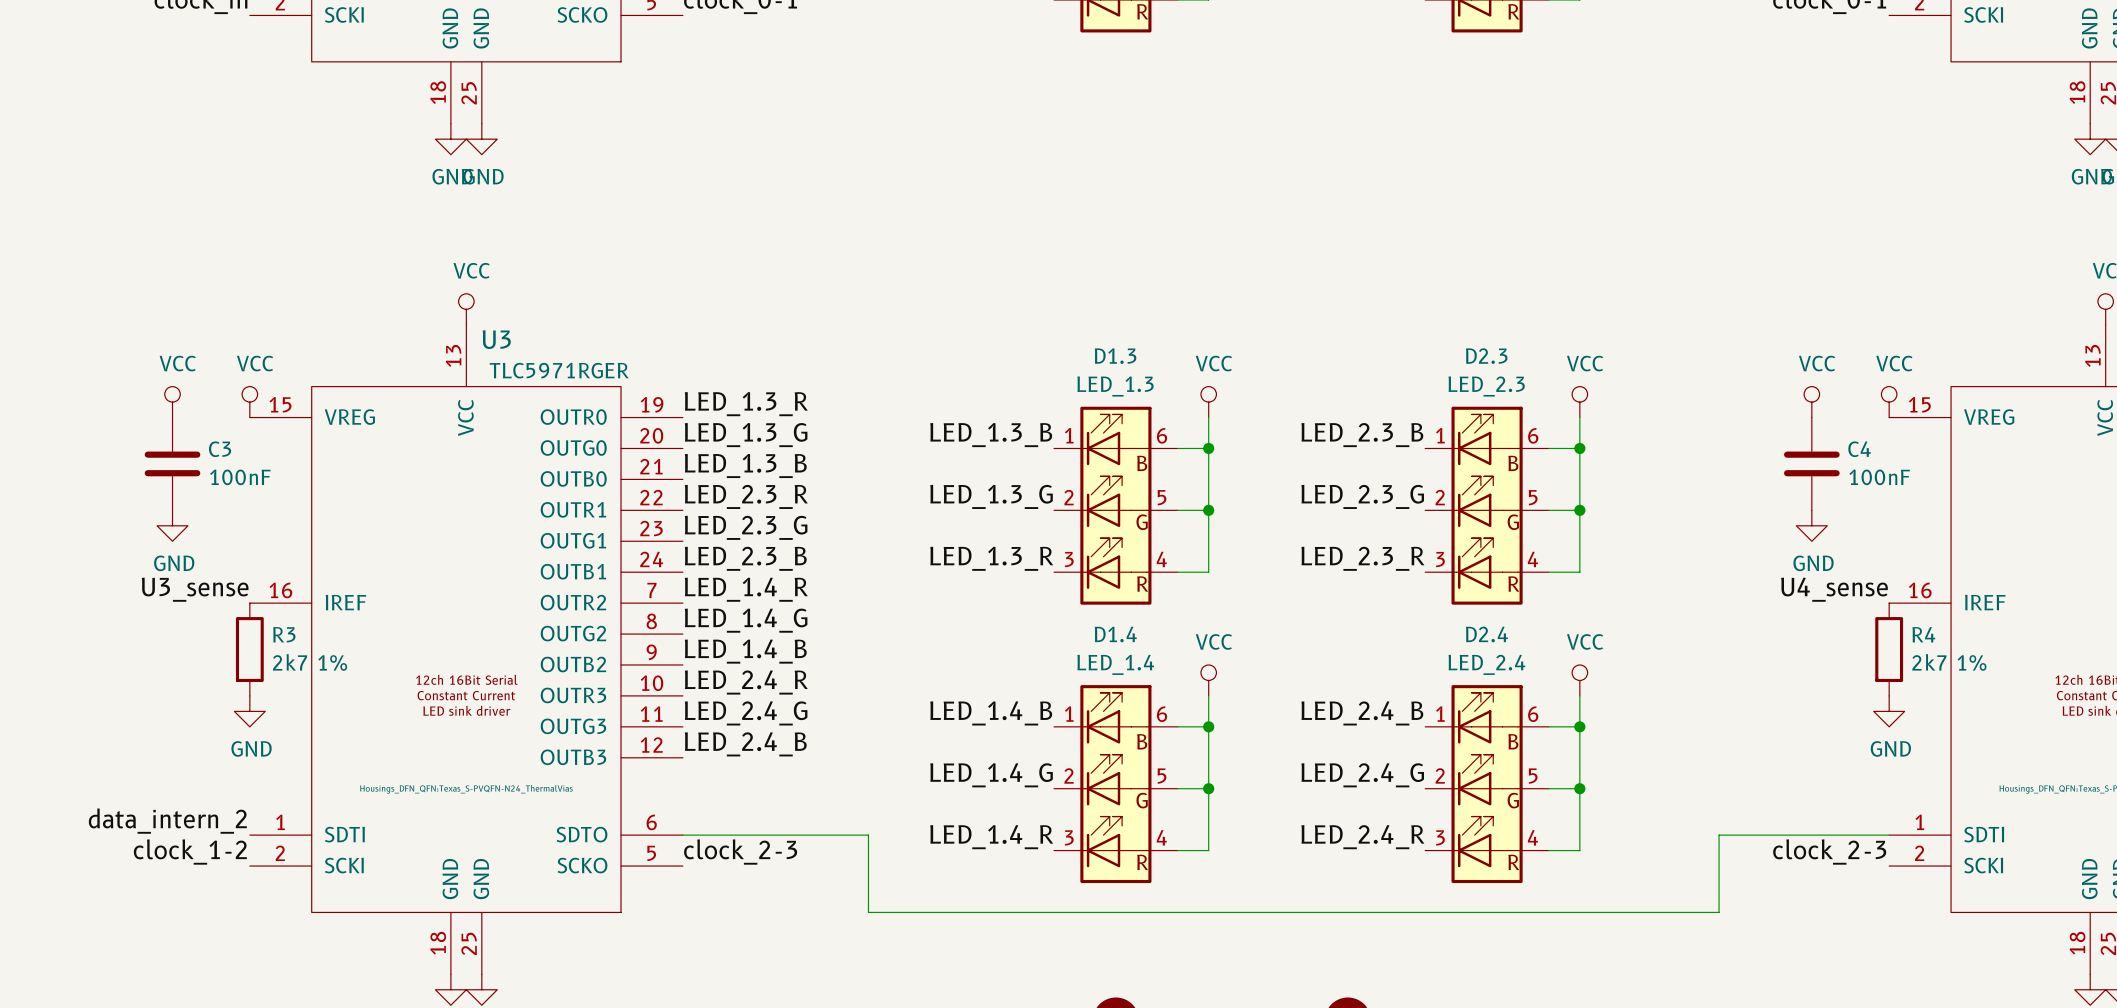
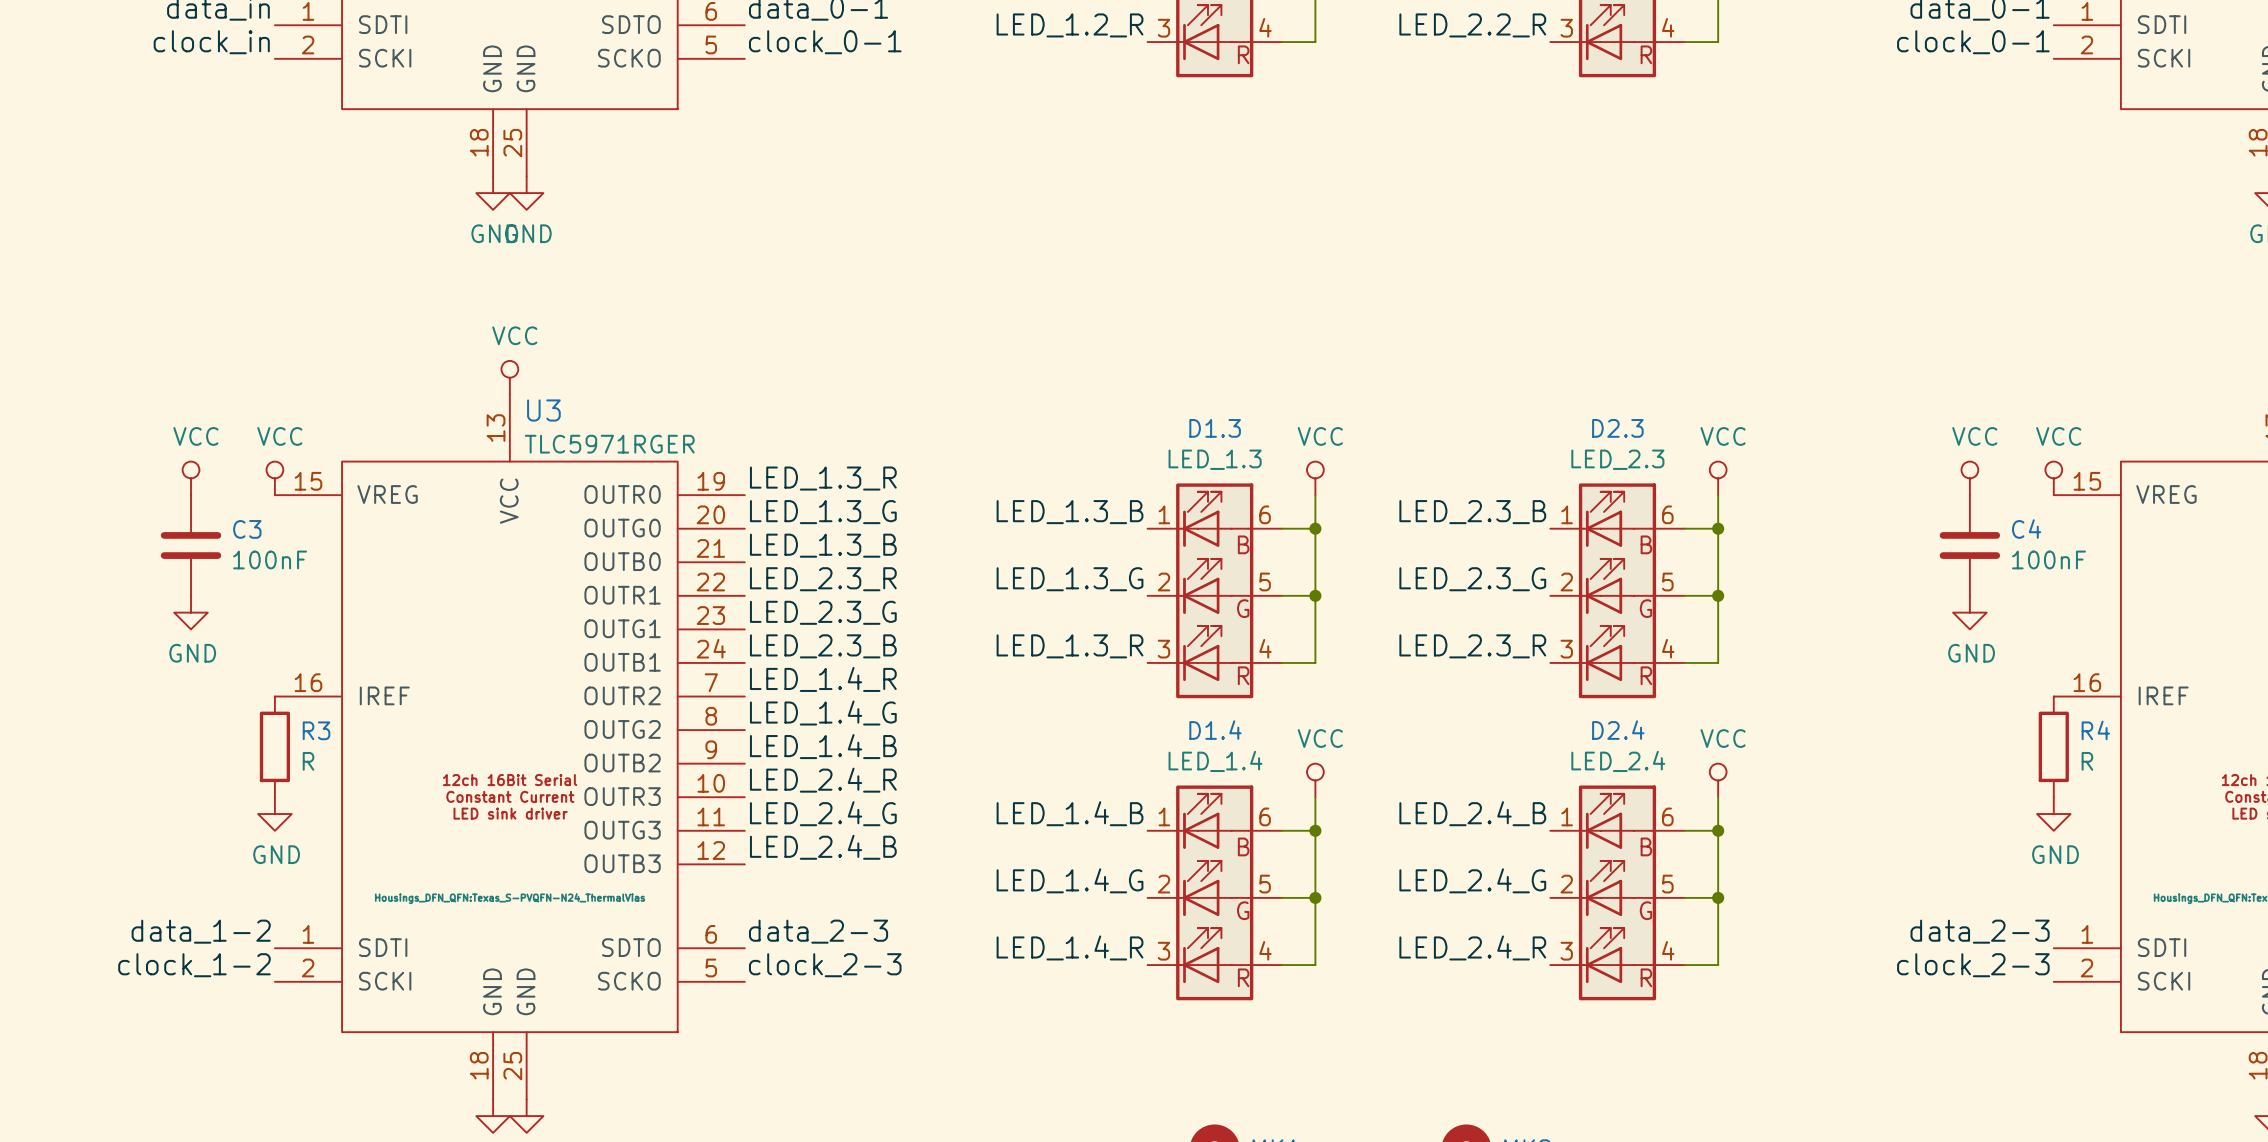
label: U3_sense (195, 589) -> none
label: U4_sense (1834, 589) -> none
R3 value: 2k7 1% (310, 662) -> R (308, 761)
R4 value: 2k7 1% (1949, 662) -> R (2087, 761)
label: data_intern_2 (167, 821) -> data_1-2 (201, 931)
label: none -> data_2-3 (818, 931)
label: none -> data_2-3 (1980, 931)
wire: (682, 835) (868, 835) (868, 912) (1719, 912) (1719, 835) (1889, 835) -> none

